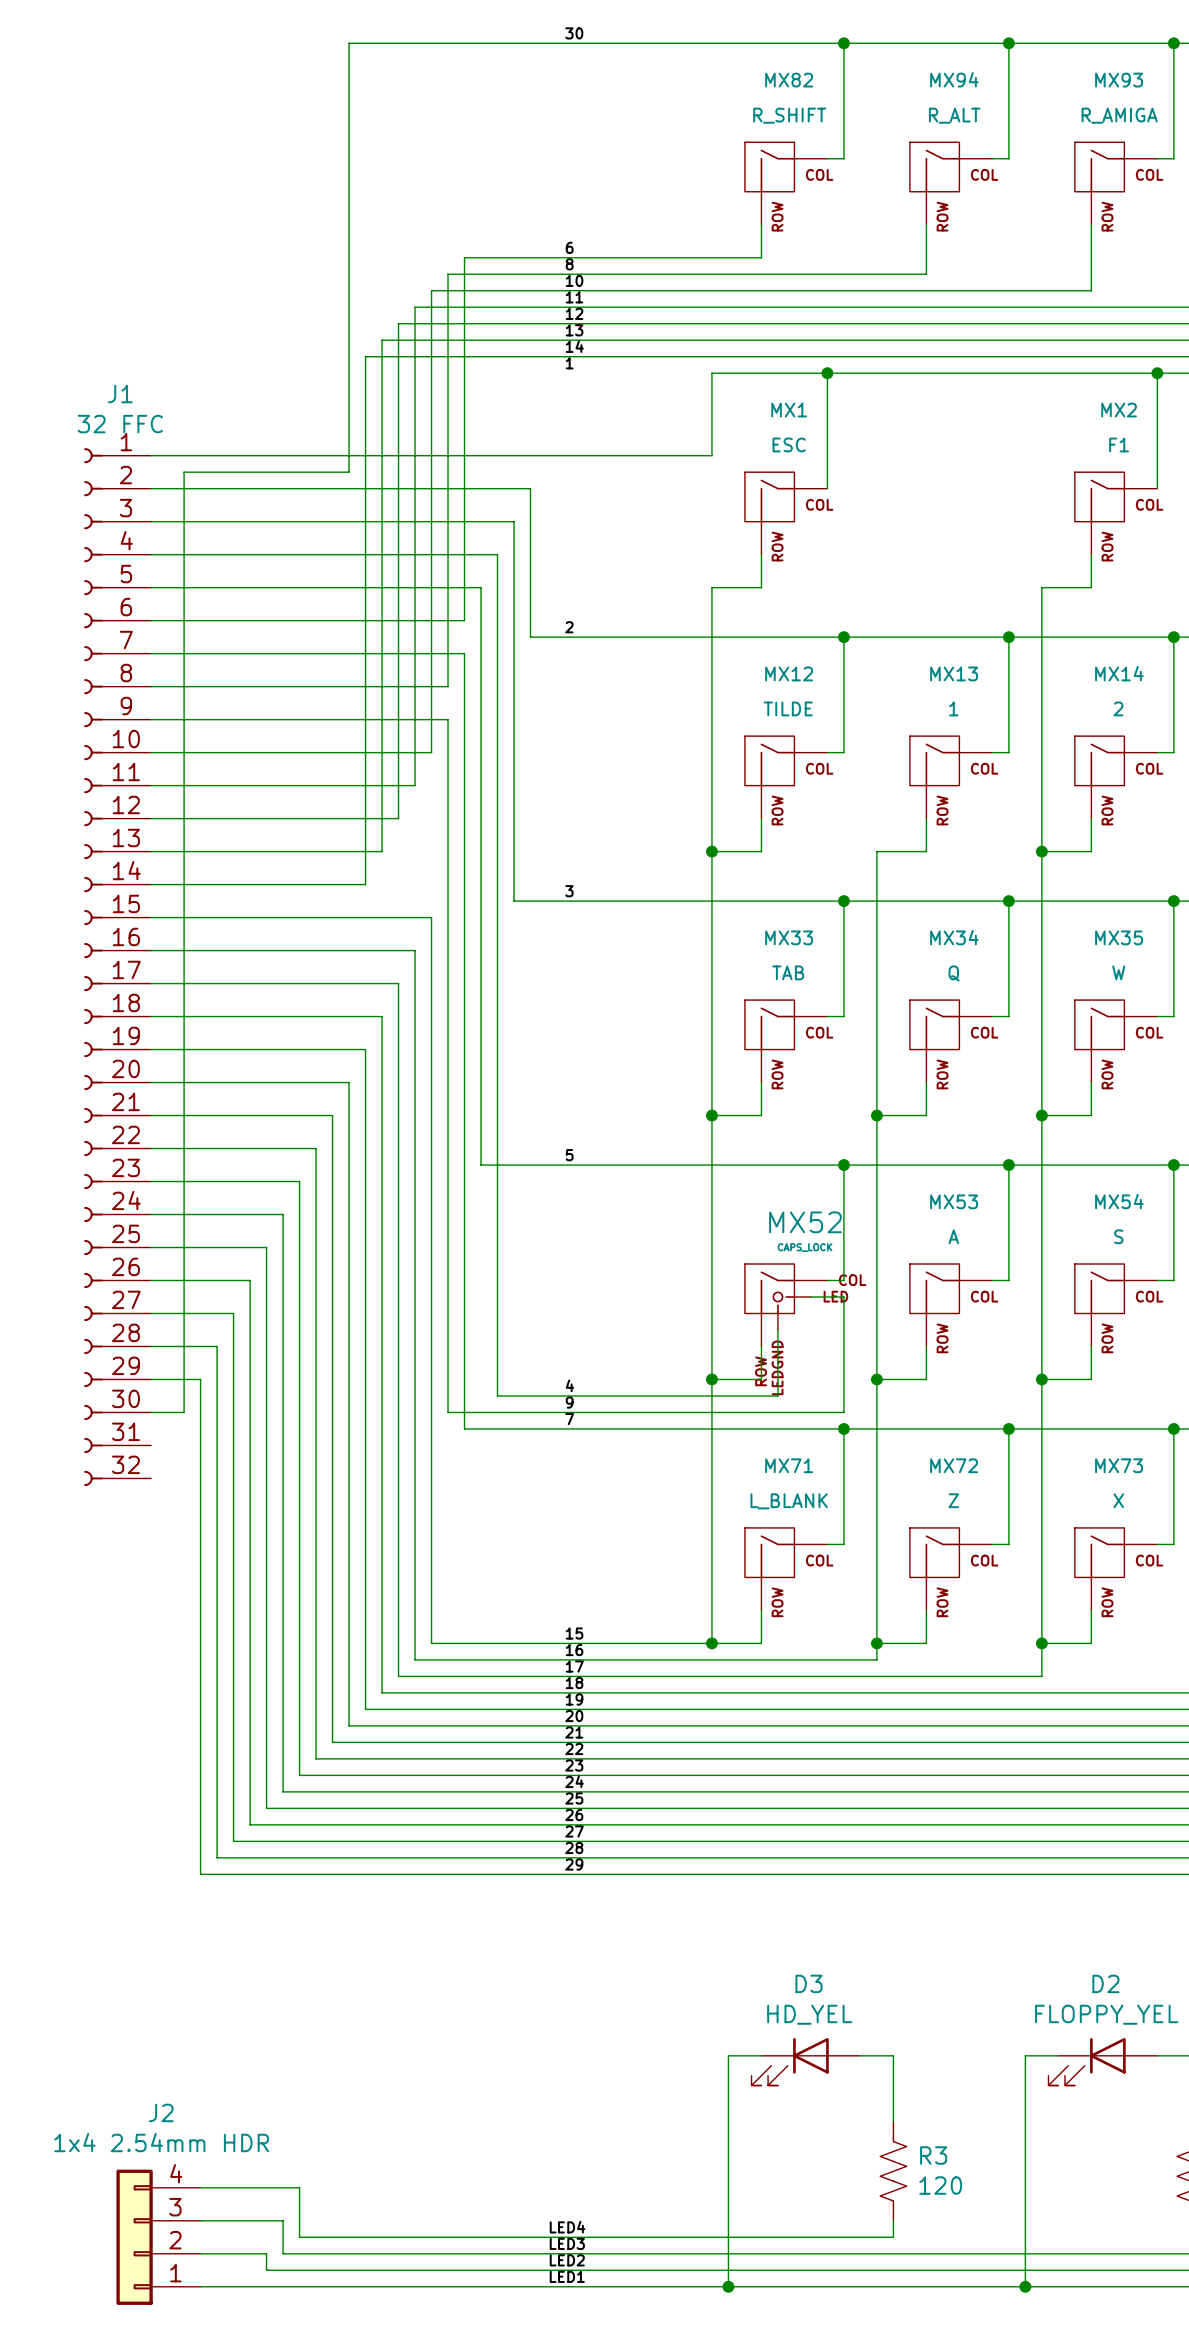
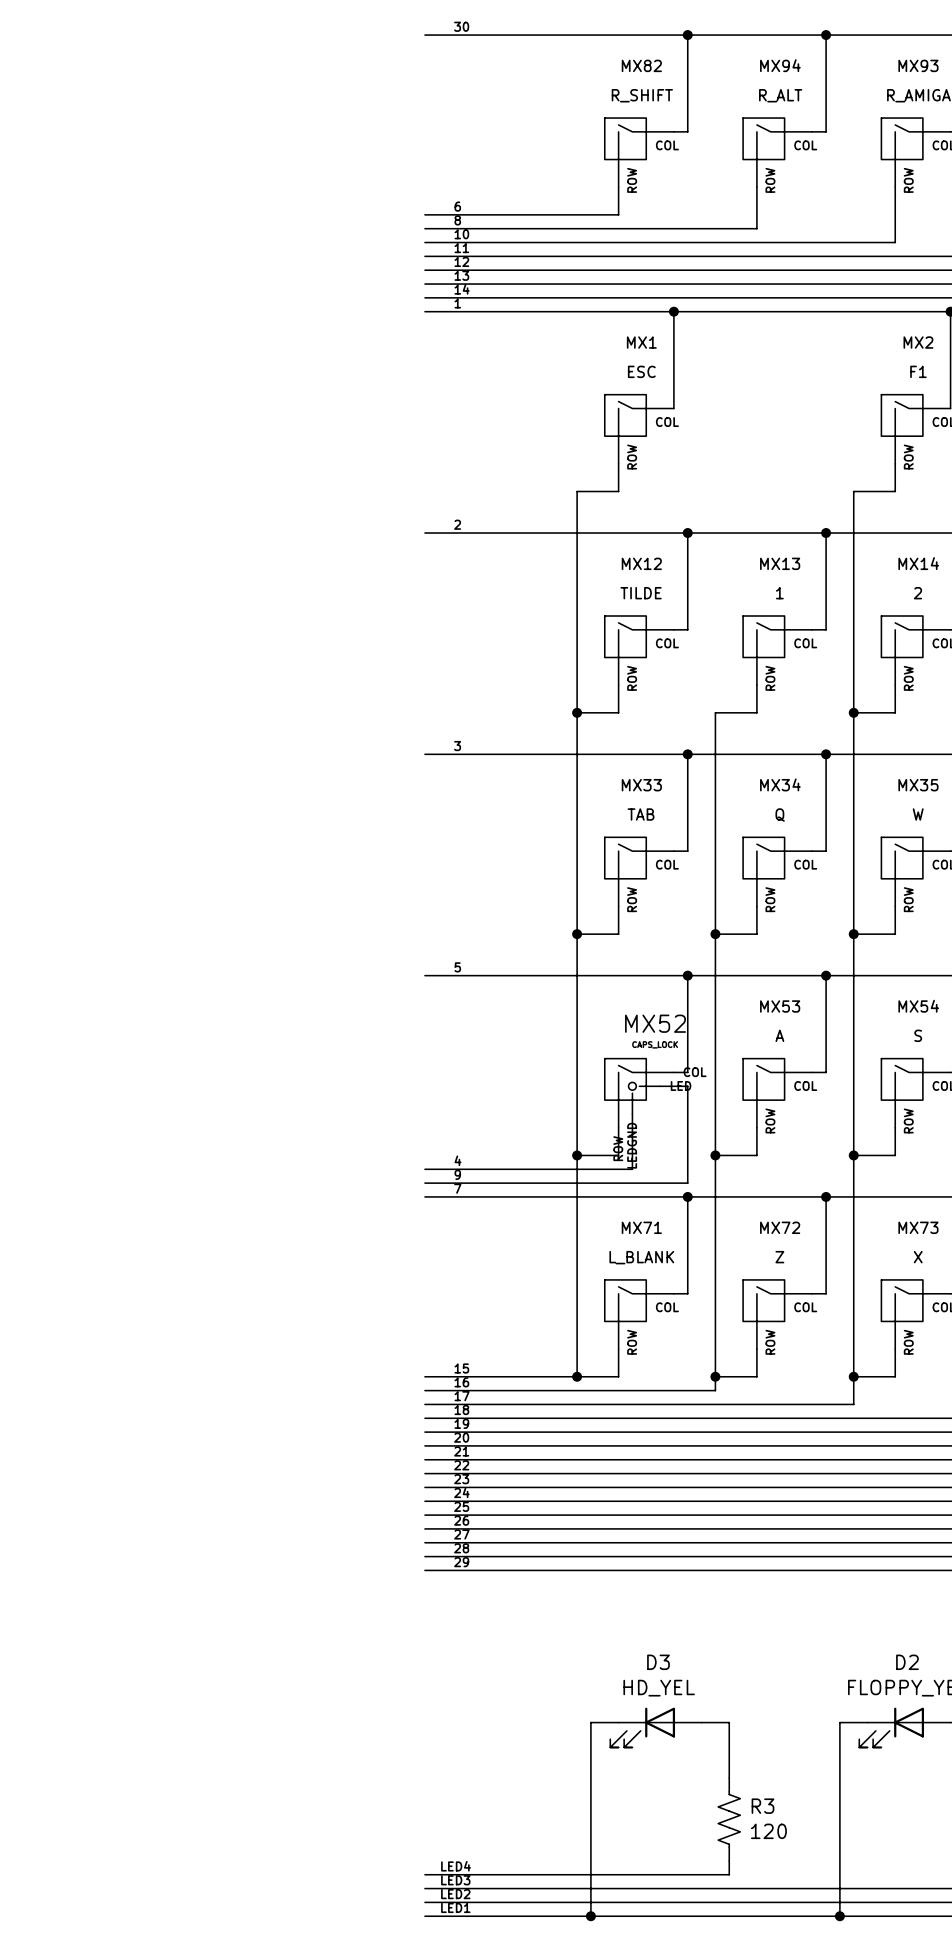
wire: (530, 43) (349, 43) (349, 472) (184, 472) (184, 1412) (151, 1412) -> none
wire: (530, 257) (464, 257) (464, 620) (151, 620) -> none
wire: (530, 274) (448, 274) (448, 686) (151, 686) -> none
wire: (530, 290) (431, 290) (431, 752) (151, 752) -> none
wire: (530, 307) (415, 307) (415, 785) (151, 785) -> none
wire: (530, 323) (398, 323) (398, 818) (151, 818) -> none
wire: (530, 340) (382, 340) (382, 851) (151, 851) -> none
wire: (530, 356) (365, 356) (365, 884) (151, 884) -> none
wire: (711, 373) (711, 455) (151, 455) -> (577, 311) (424, 311)
wire: (151, 488) (530, 488) (530, 637) -> none
wire: (151, 521) (514, 521) (514, 901) (530, 901) -> none
wire: (151, 554) (497, 554) (497, 1395) (530, 1395) -> none
wire: (151, 587) (481, 587) (481, 1165) (530, 1165) -> none
wire: (151, 653) (464, 653) (464, 1428) (530, 1428) -> none
wire: (151, 719) (448, 719) (448, 1412) (530, 1412) -> none
wire: (151, 917) (431, 917) (431, 1643) (530, 1643) -> none
wire: (151, 950) (415, 950) (415, 1659) (530, 1659) -> none
J1: 32 FFC (117, 967) -> none
wire: (151, 983) (398, 983) (398, 1676) (530, 1676) -> none
wire: (151, 1016) (382, 1016) (382, 1692) (530, 1692) -> none
wire: (151, 1049) (365, 1049) (365, 1709) (530, 1709) -> none
wire: (151, 1082) (349, 1082) (349, 1725) (530, 1725) -> none
wire: (151, 1115) (332, 1115) (332, 1742) (530, 1742) -> none
wire: (151, 1148) (316, 1148) (316, 1758) (530, 1758) -> none
wire: (151, 1181) (299, 1181) (299, 1775) (530, 1775) -> none
wire: (151, 1214) (283, 1214) (283, 1791) (530, 1791) -> none
wire: (151, 1247) (266, 1247) (266, 1808) (530, 1808) -> none
wire: (151, 1280) (250, 1280) (250, 1824) (530, 1824) -> none
wire: (151, 1313) (233, 1313) (233, 1841) (530, 1841) -> none
wire: (151, 1346) (217, 1346) (217, 1857) (530, 1857) -> none
wire: (151, 1379) (200, 1379) (200, 1874) (530, 1874) -> none
wire: (200, 2187) (299, 2187) (299, 2237) (530, 2237) -> none
wire: (200, 2220) (283, 2220) (283, 2253) (530, 2253) -> none
J2: 1x4 2.54mm HDR (158, 2237) -> none
wire: (200, 2253) (266, 2253) (266, 2270) (530, 2270) -> none
wire: (200, 2286) (530, 2286) -> none

